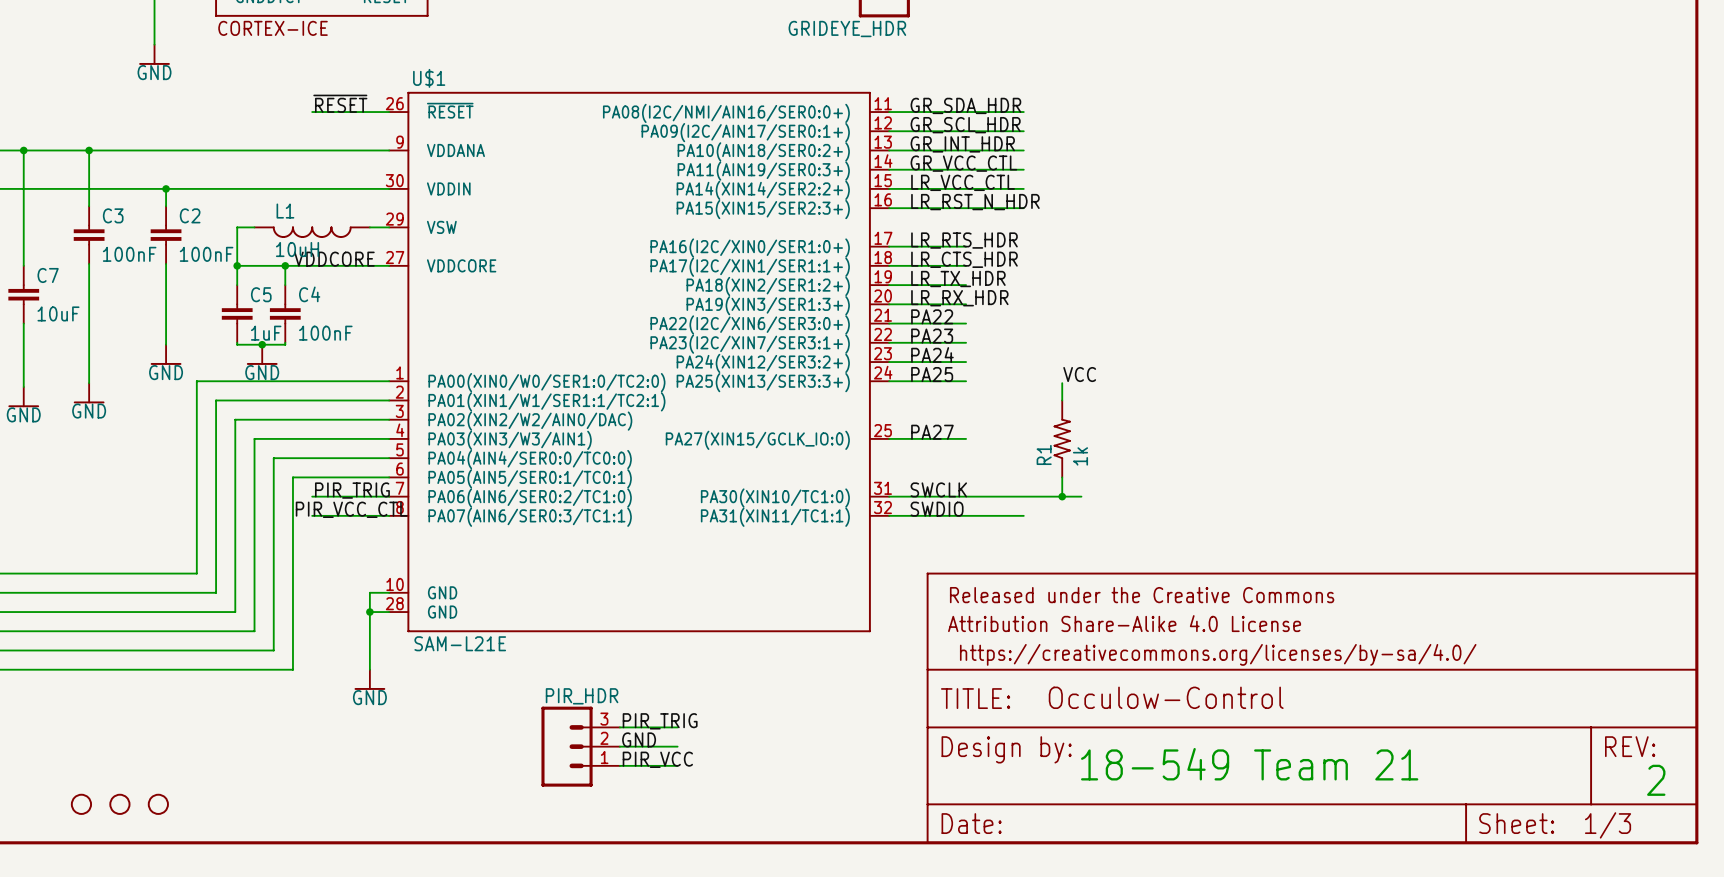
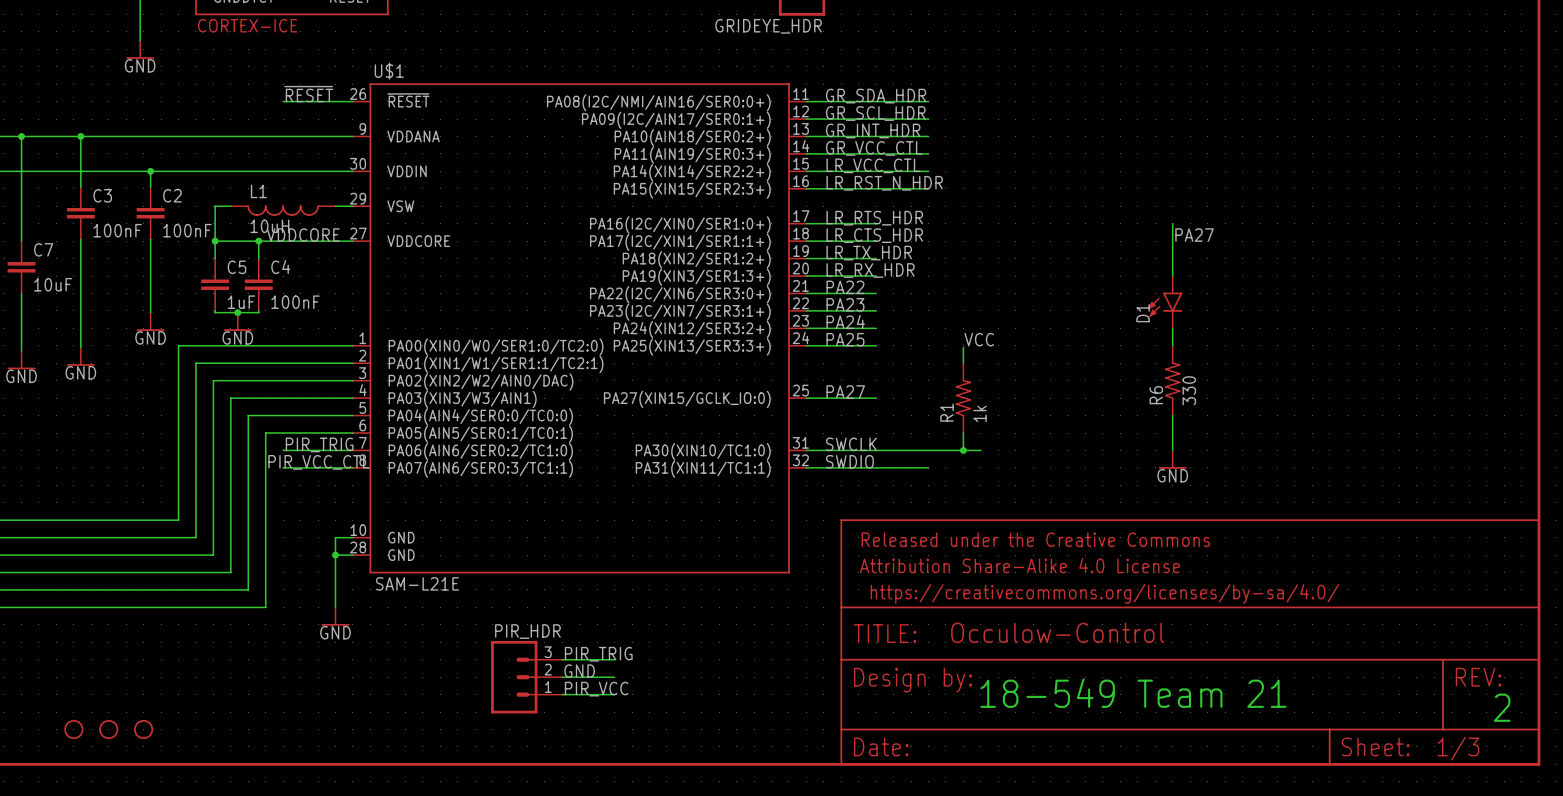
wire: none -> (1172, 223) (1172, 276)
label: none -> PA27 (1194, 235)
D1: none -> (1165, 302)
wire: none -> (1172, 328) (1172, 345)
R6: none -> 330 (1172, 380)
wire: none -> (1172, 415) (1172, 450)
power symbol: none -> GND (1172, 459)

